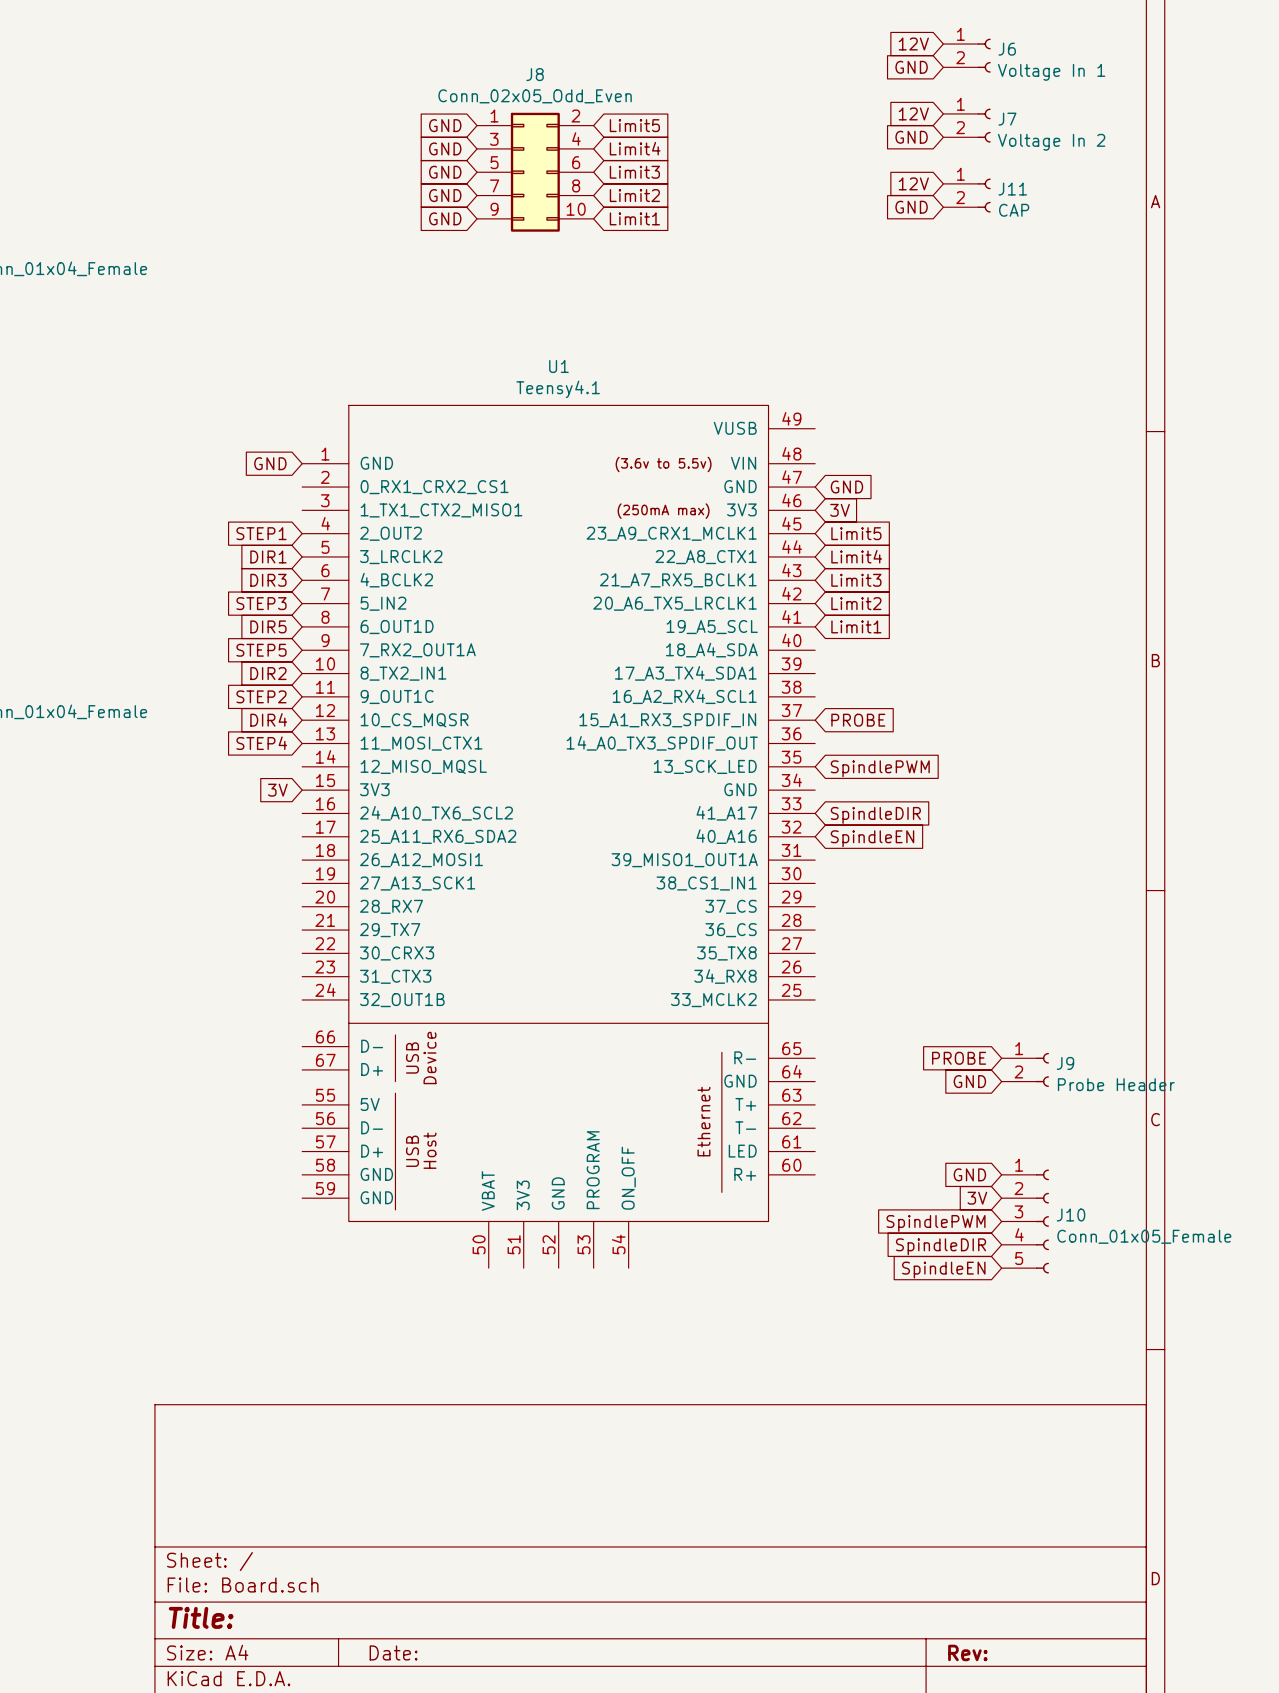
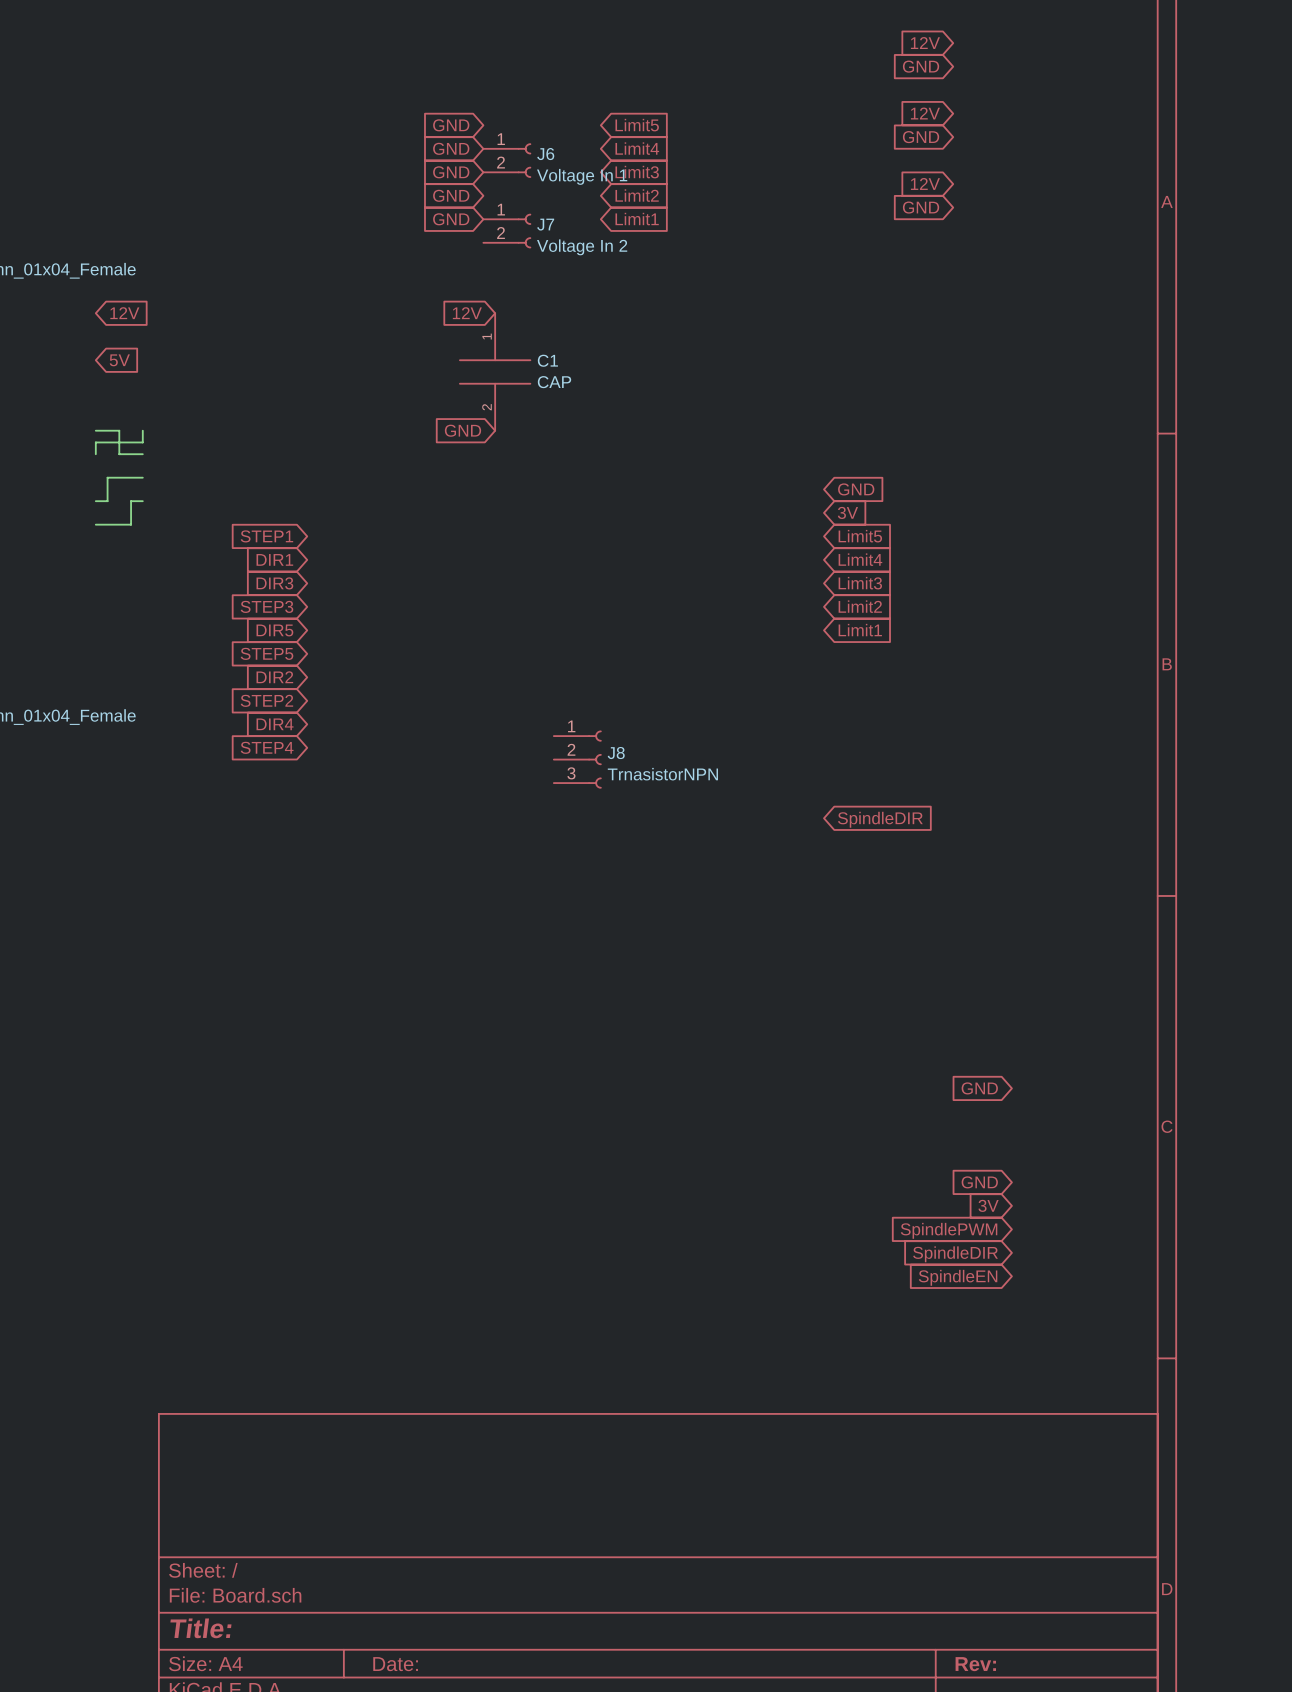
J6 position: (967, 55) -> (507, 160)
J8 name position: J8 (535, 74) -> J8 (616, 753)
J8 value: Conn_02x05_Odd_Even (535, 96) -> TrnasistorNPN (662, 774)
J8 symbol: [477, 112, 594, 232] -> [553, 730, 602, 789]
J7 position: (967, 125) -> (507, 231)
J11: CAP (967, 195) -> none
global label: none -> 12V (124, 313)
global label: none -> 12V (467, 313)
global label: none -> 5V (119, 360)
C1: none -> CAP (495, 371)
wire: none -> (95, 430) (119, 430) (119, 454) (142, 454)
wire: none -> (142, 430) (142, 442) (95, 442) (95, 454)
global label position: GND (270, 463) -> GND (462, 430)
wire: none -> (142, 477) (107, 477) (107, 501) (95, 501)
wire: none -> (142, 501) (131, 501) (131, 524) (95, 524)
global label: PROBE (858, 720) -> none
global label: SpindlePWM (880, 768) -> none
global label: 3V (277, 790) -> none
U1: Teensy4.1 (558, 836) -> none
global label: SpindleEN (872, 838) -> none
global label: PROBE (959, 1058) -> none
J9: Probe Header (1025, 1069) -> none
J10: Conn_01x05_Female (1025, 1221) -> none

